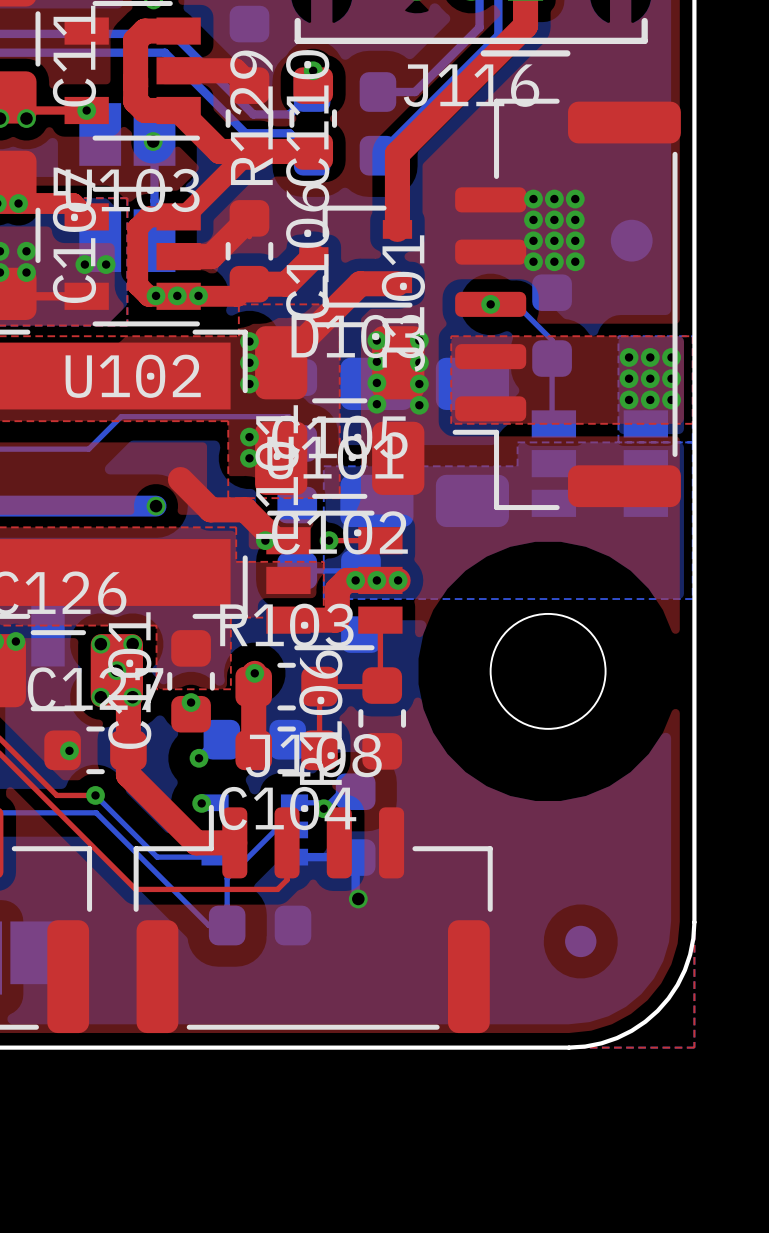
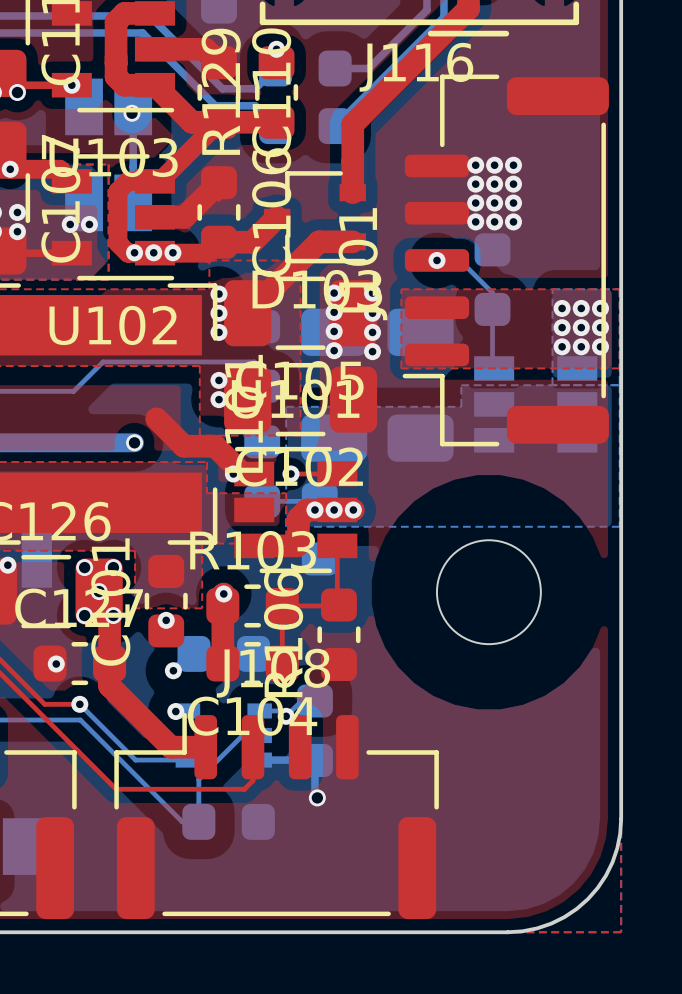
part: (631, 240) -> none
part: (580, 941) -> none

